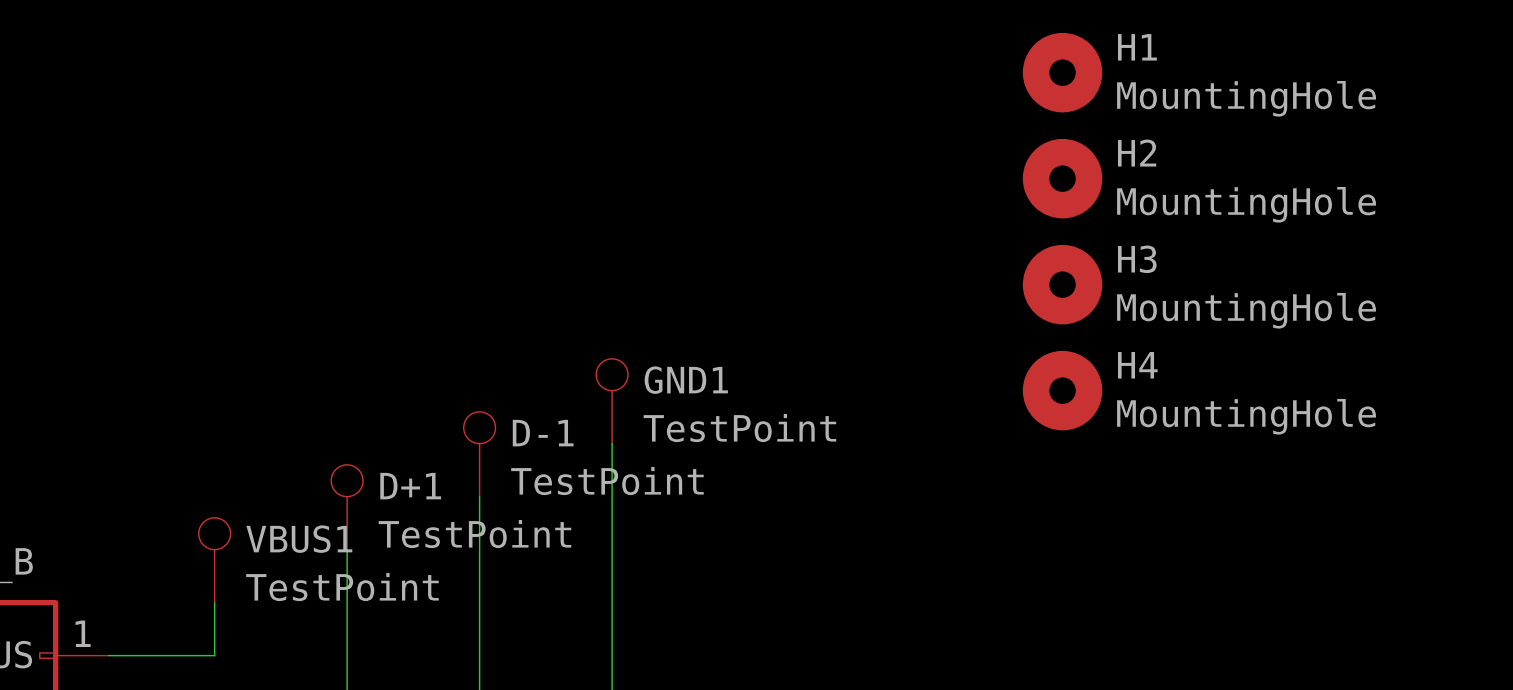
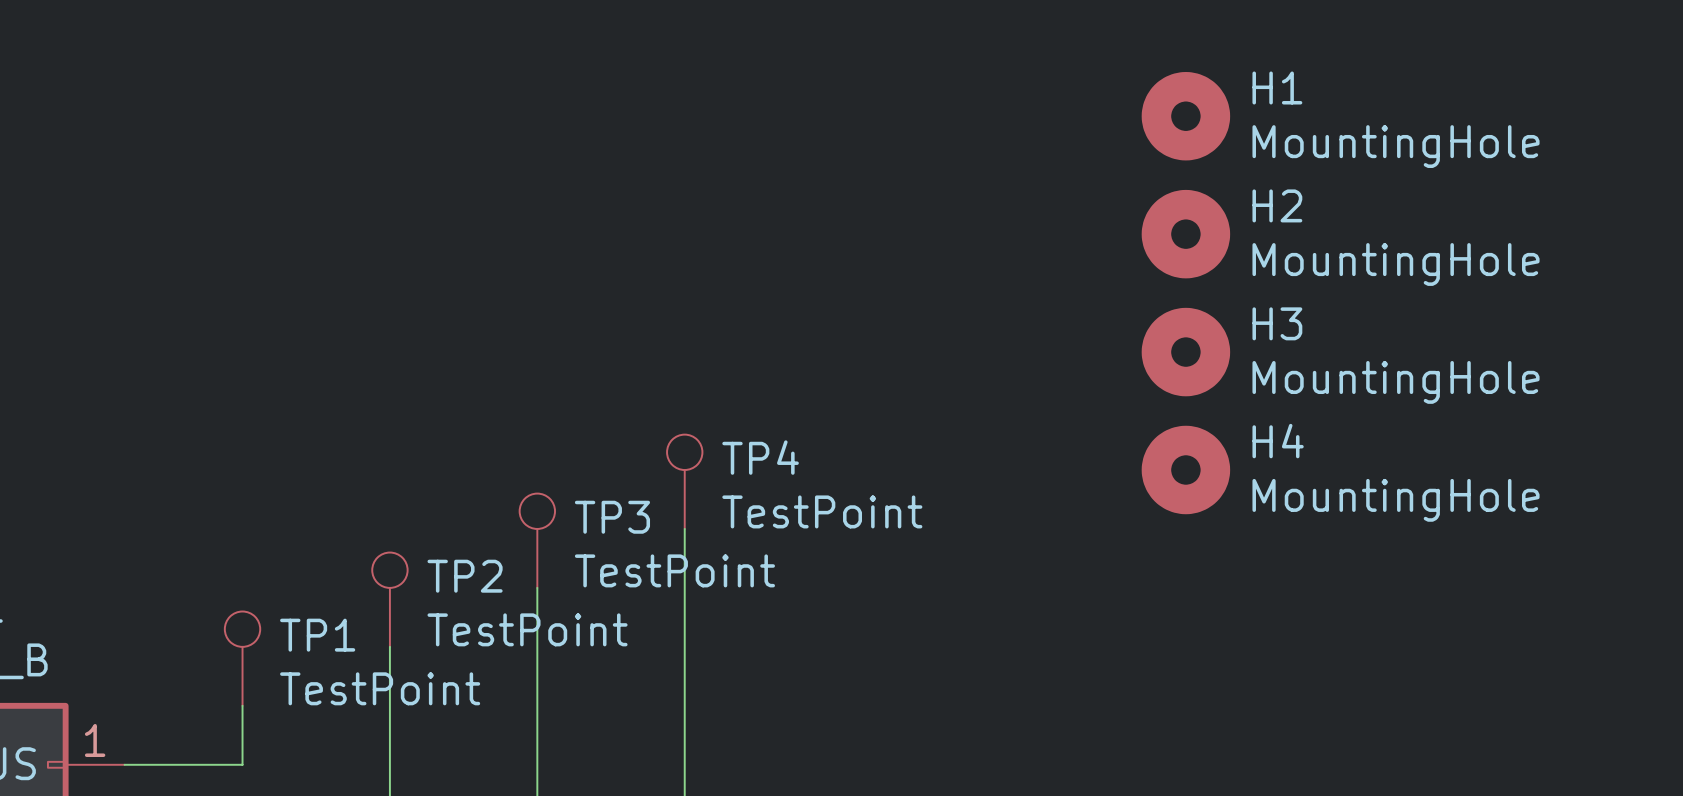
GND1 name: GND1 (686, 380) -> TP4 (760, 457)
D-1 name: D-1 (543, 433) -> TP3 (612, 517)
D+1 name: D+1 (410, 486) -> TP2 (465, 576)
VBUS1 name: VBUS1 (299, 539) -> TP1 (317, 635)

